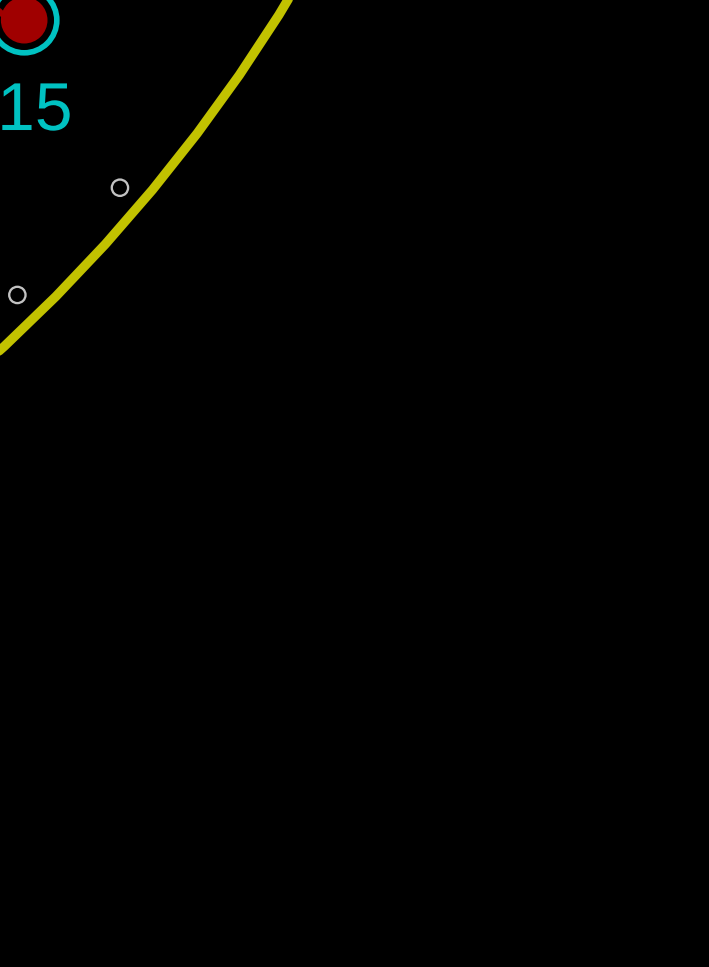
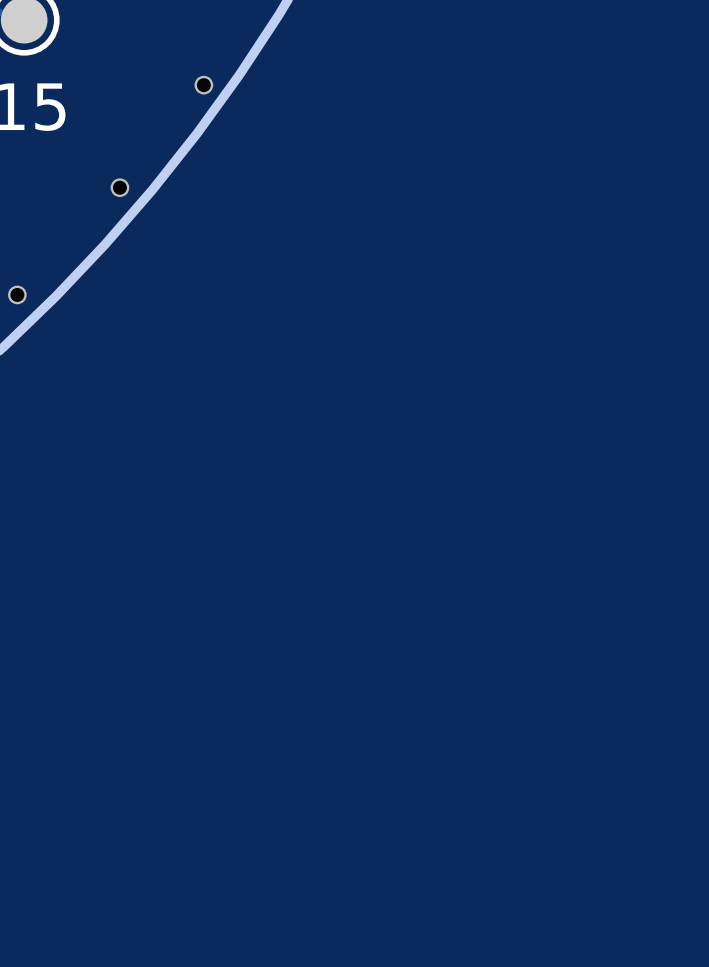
via: none -> (203, 85)

